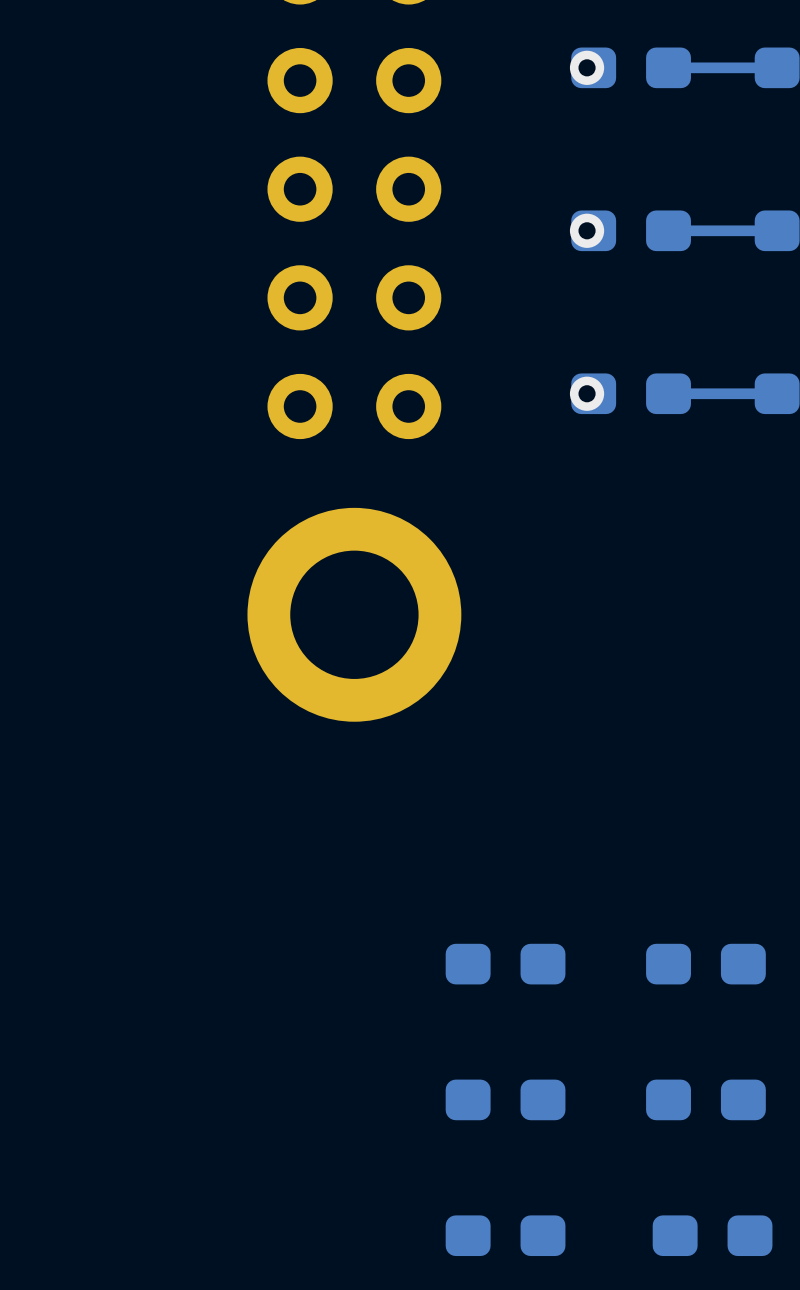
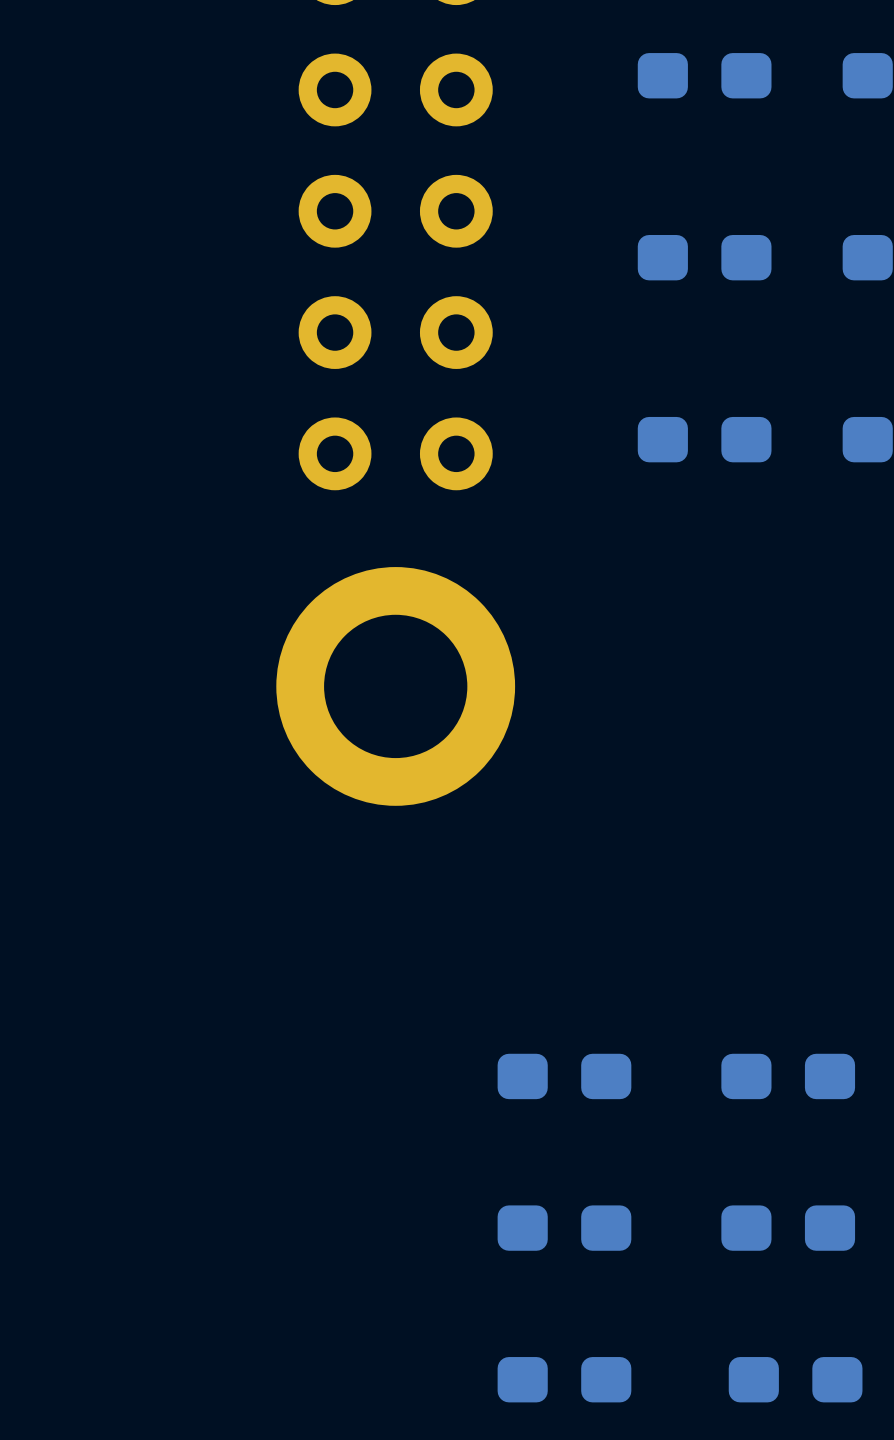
via: (587, 67) -> none
bottom track: (668, 67) (777, 67) -> none
via: (587, 230) -> none
bottom track: (668, 230) (777, 230) -> none
via: (587, 393) -> none
bottom track: (668, 393) (777, 393) -> none

